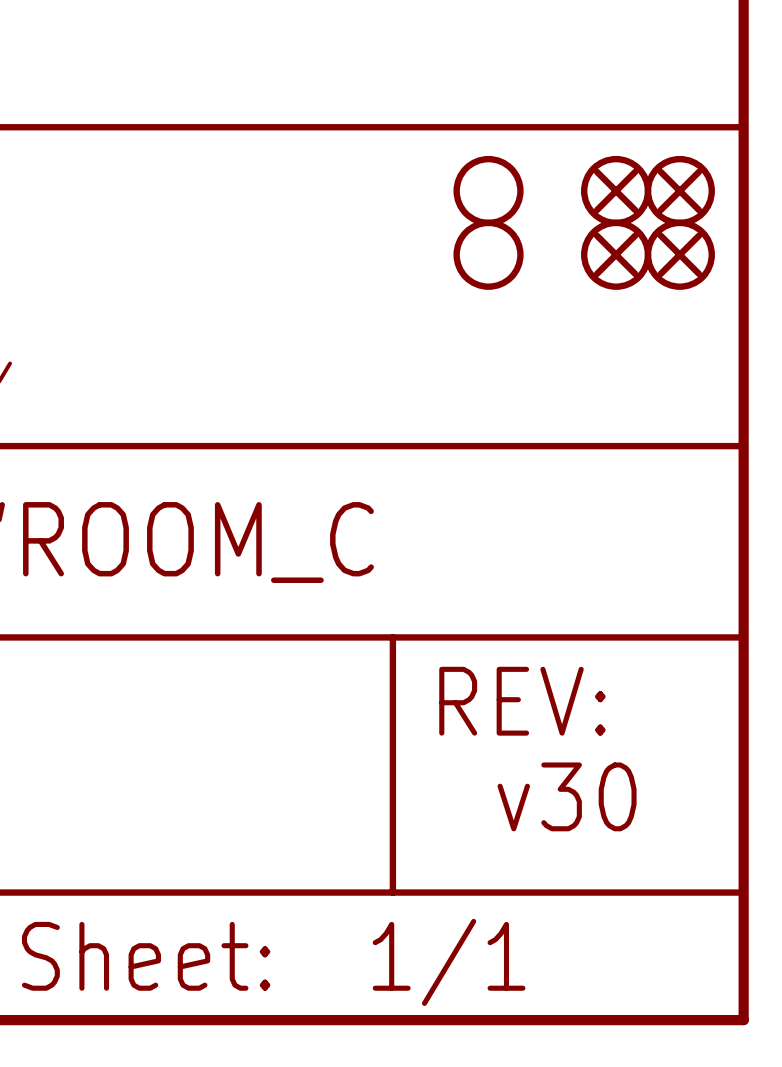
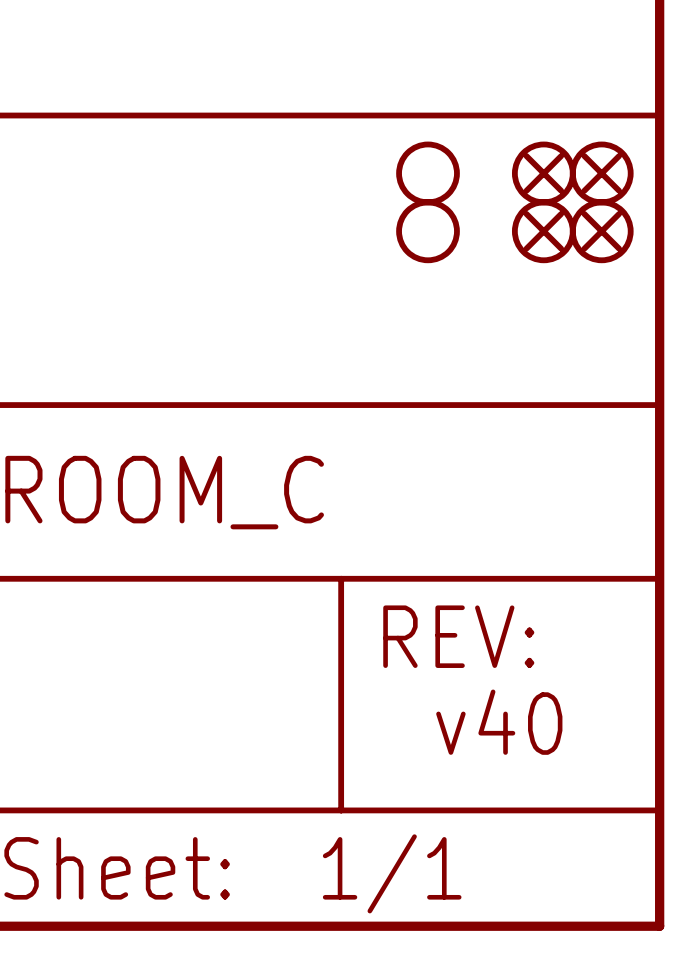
text: v30 (567, 796) -> v40 (499, 722)

